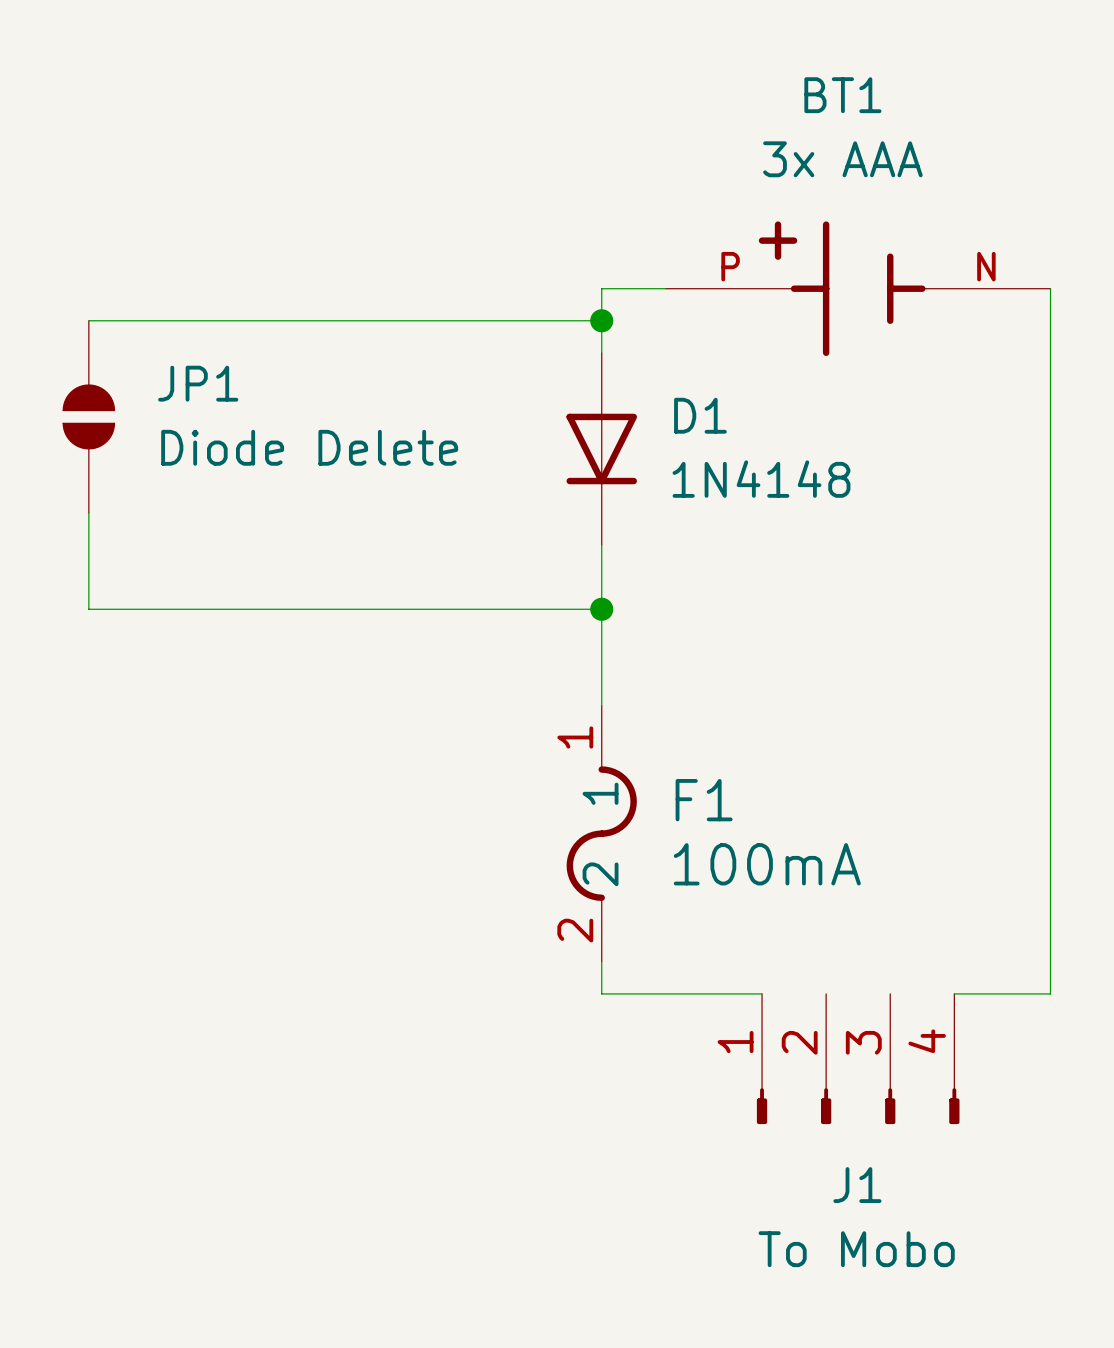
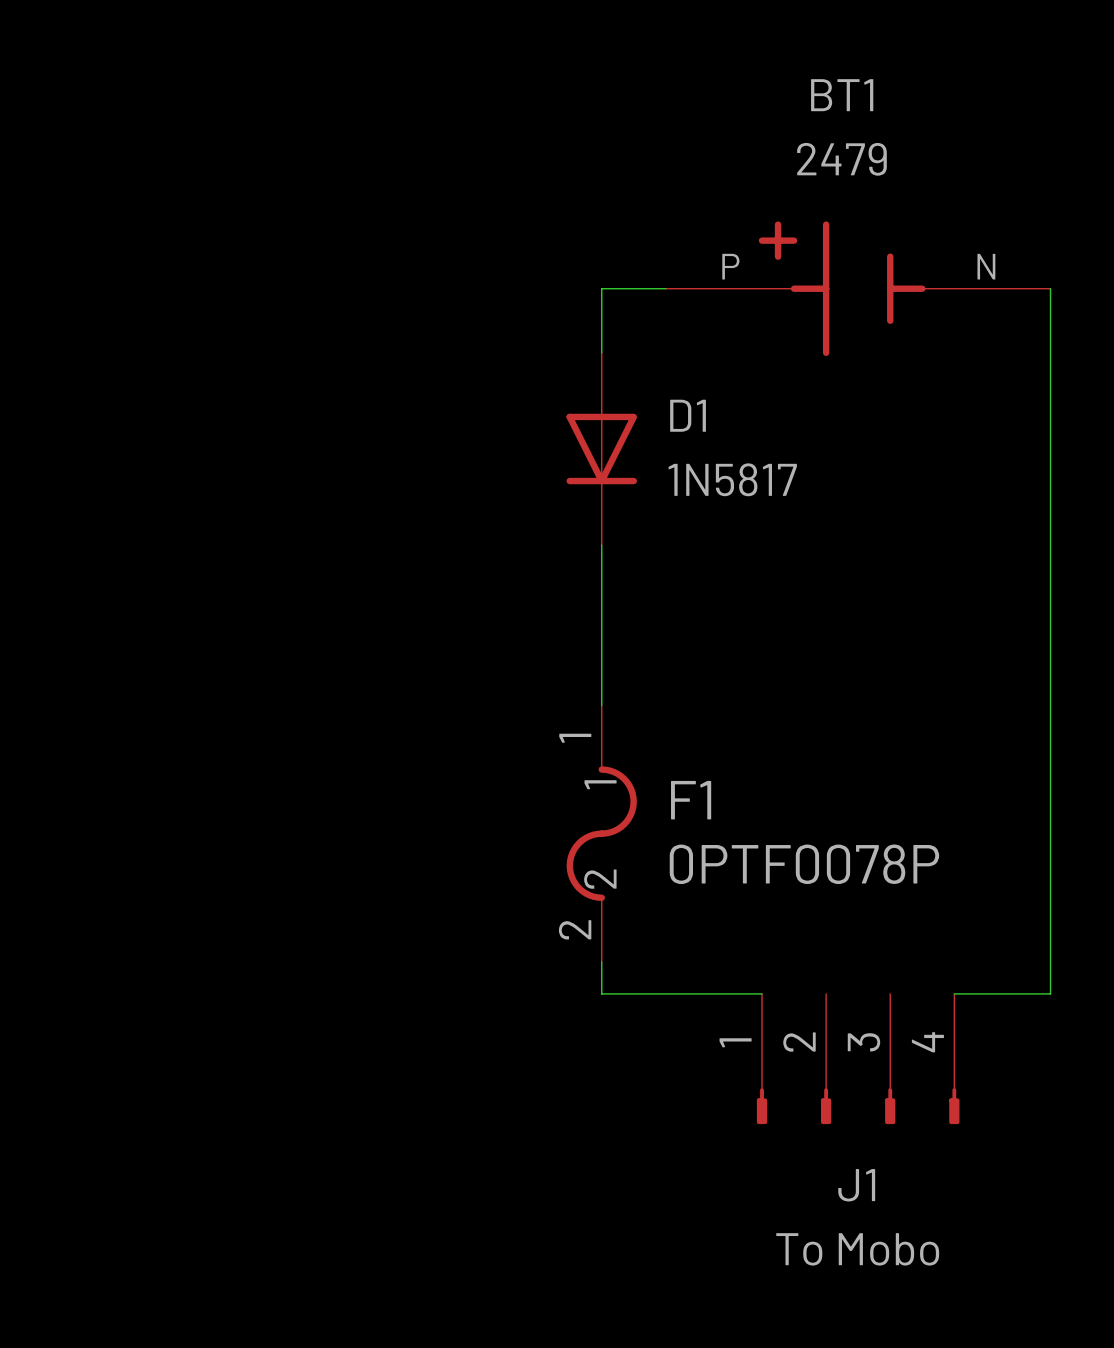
BT1 value: 3x AAA (842, 159) -> 2479 (841, 159)
wire: (88, 320) (601, 320) -> none
junction: (601, 320) -> none
JP1: Diode Delete (88, 416) -> none
D1 value: 1N4148 (761, 479) -> 1N5817 (732, 479)
wire: (88, 513) (88, 609) (601, 609) -> none
junction: (601, 609) -> none
F1 value: 100mA (767, 864) -> 0PTF0078P (804, 864)

